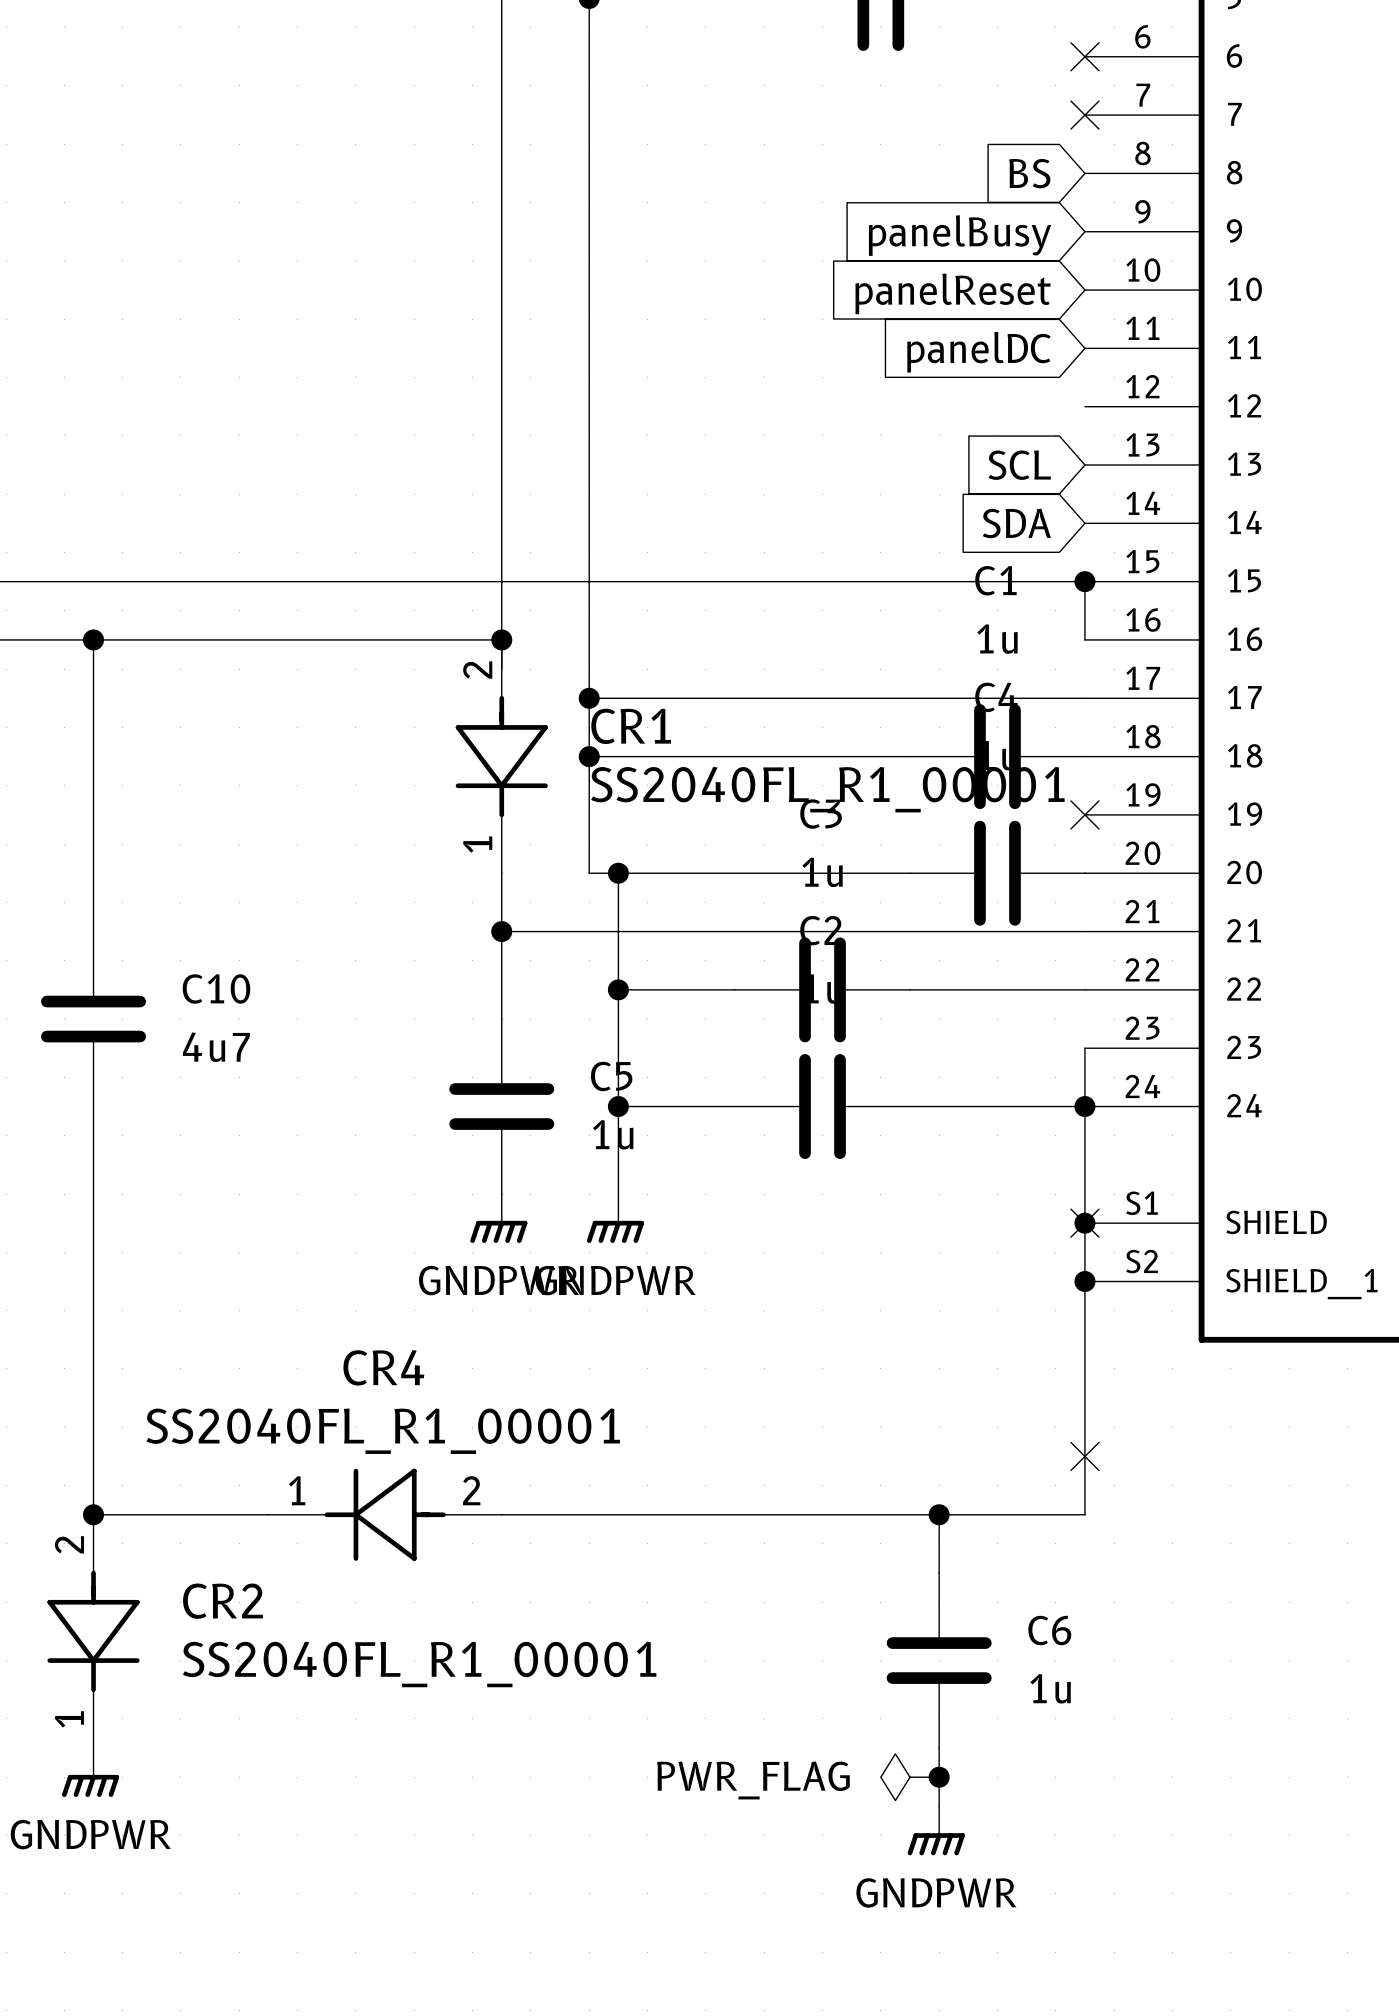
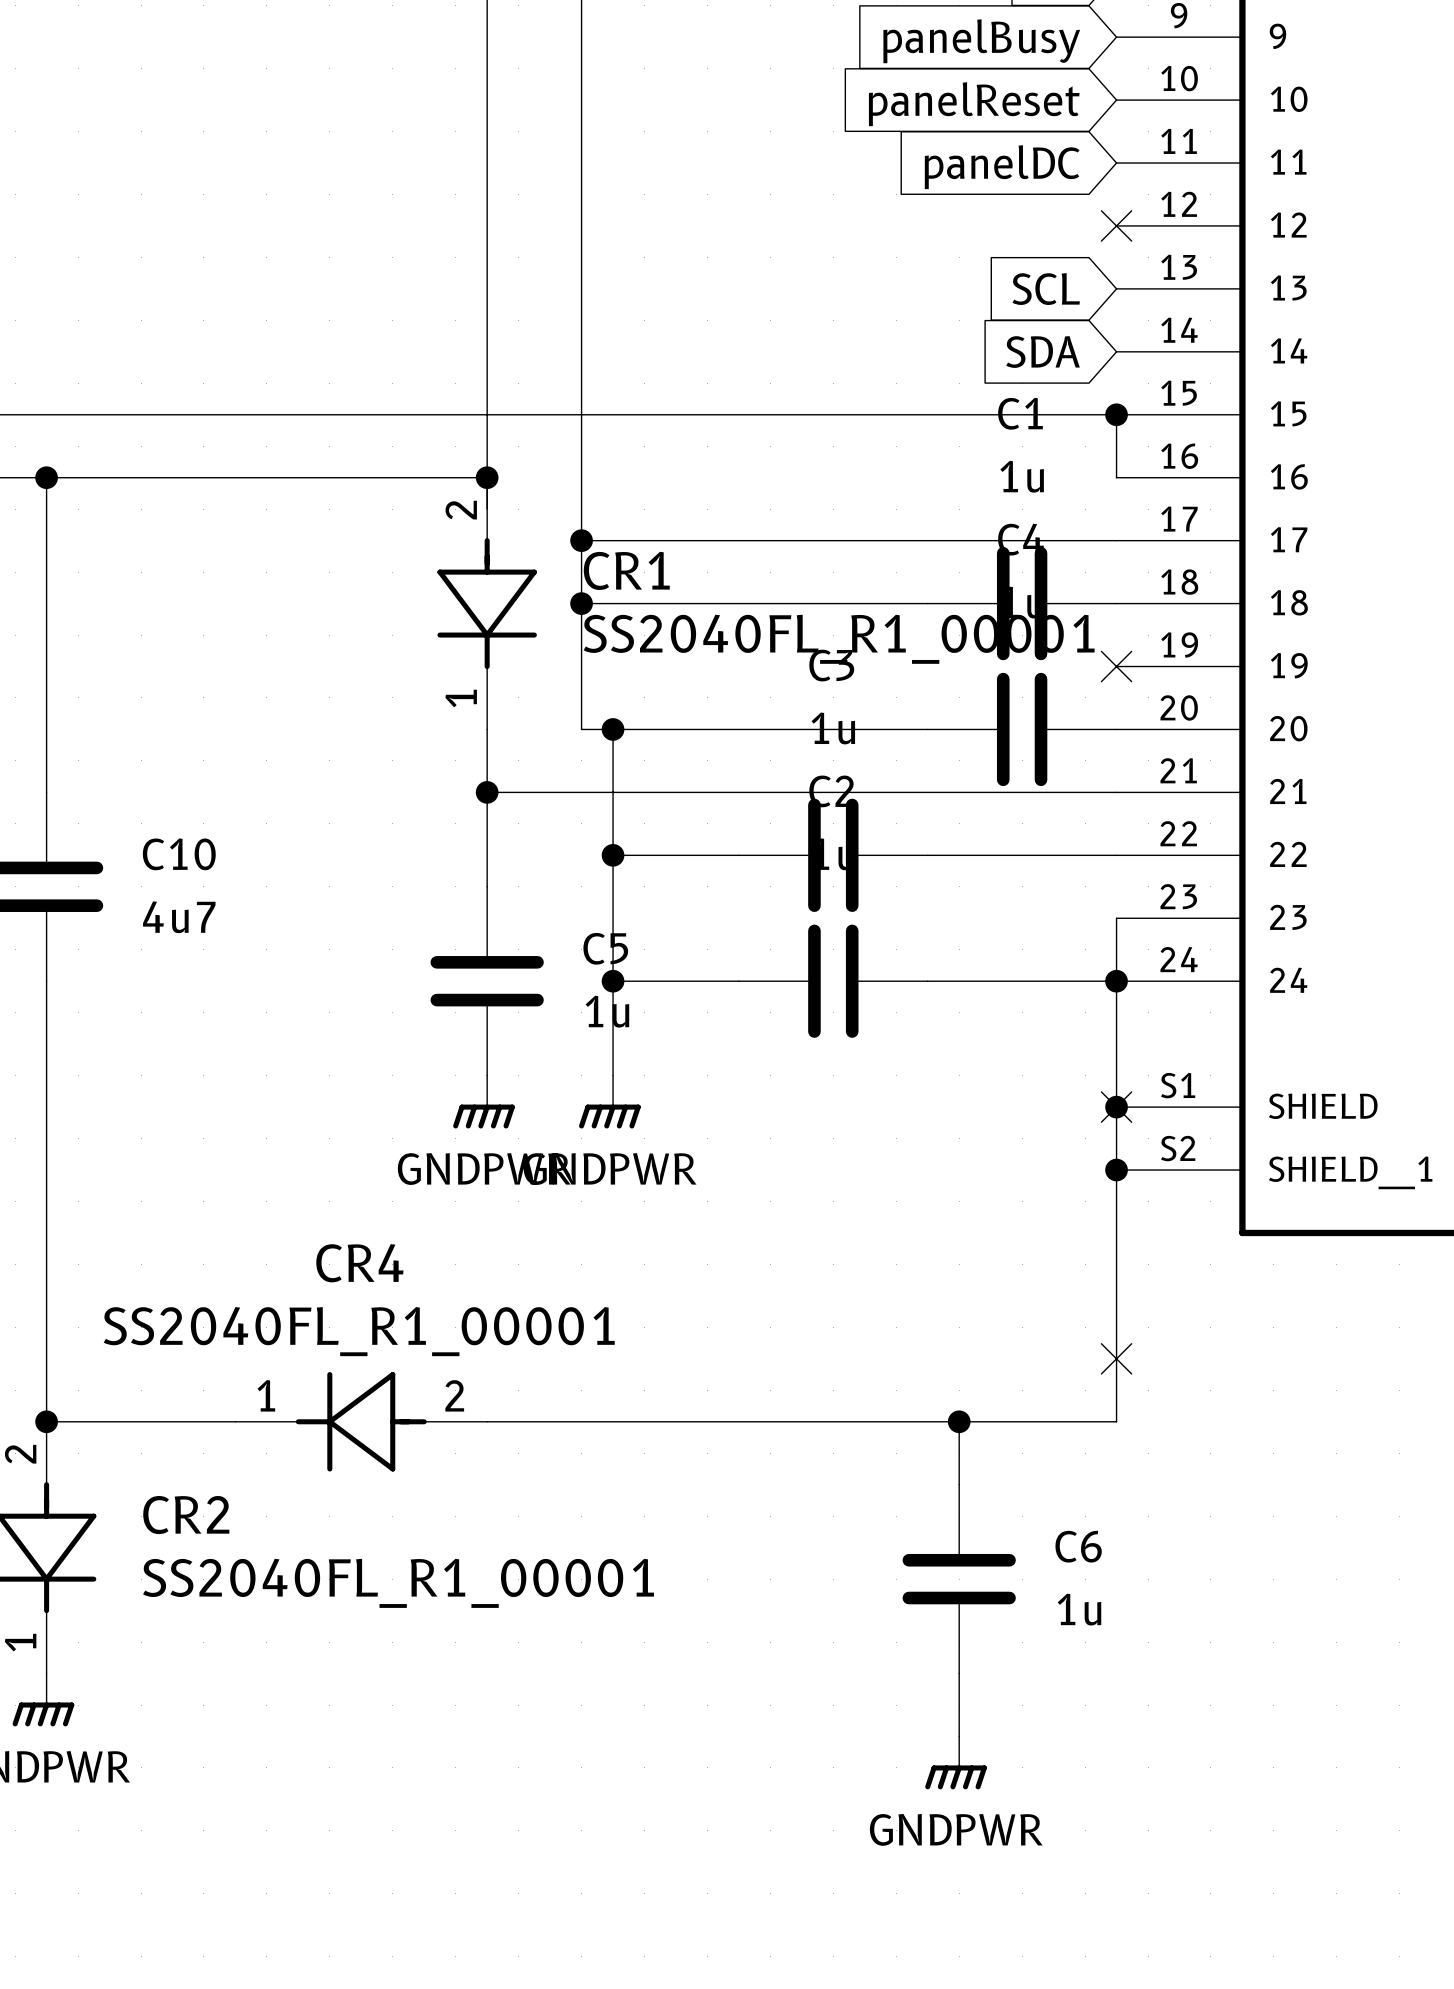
no-connect mark: none -> (1116, 225)
power symbol: PWR_FLAG (910, 1777) -> none
junction: (939, 1777) -> none

